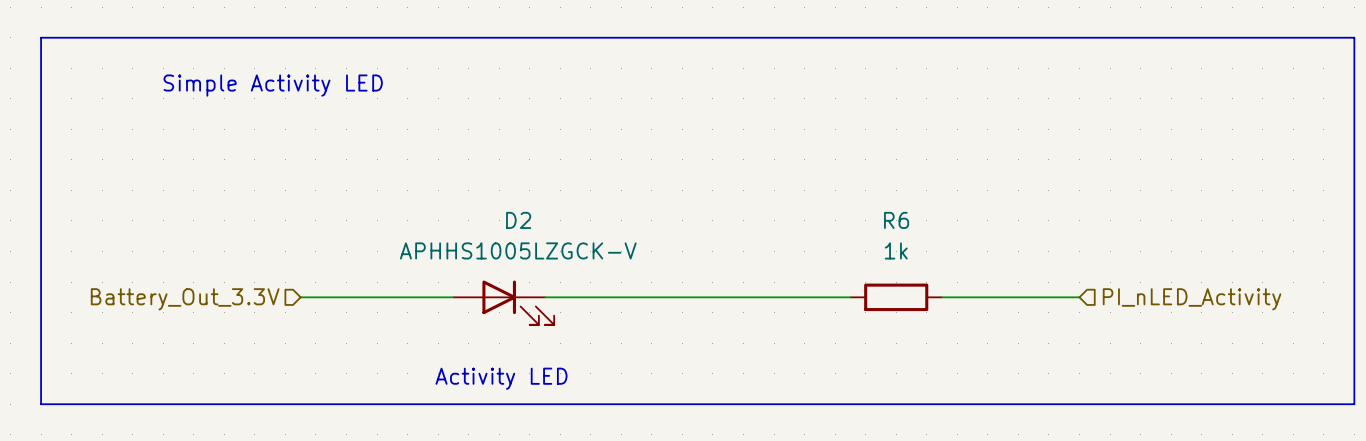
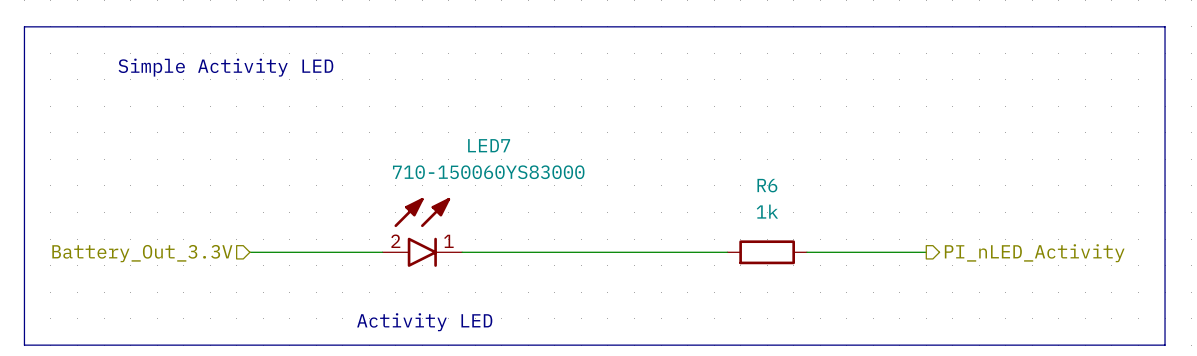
LED7: none -> 710-150060YS83000 (422, 232)
hierarchical label shape: input (1192, 299) -> output (1034, 253)
D2: APHHS1005LZGCK-V (503, 302) -> none

